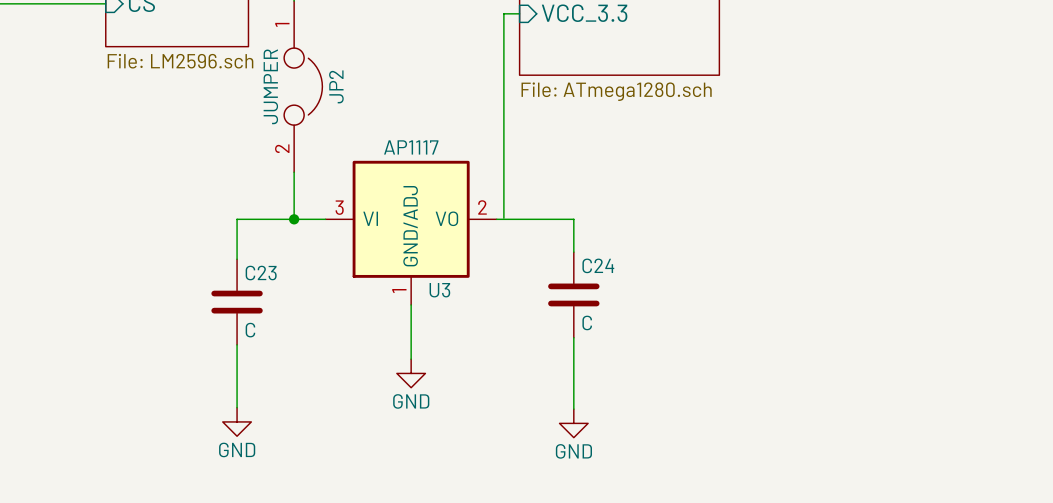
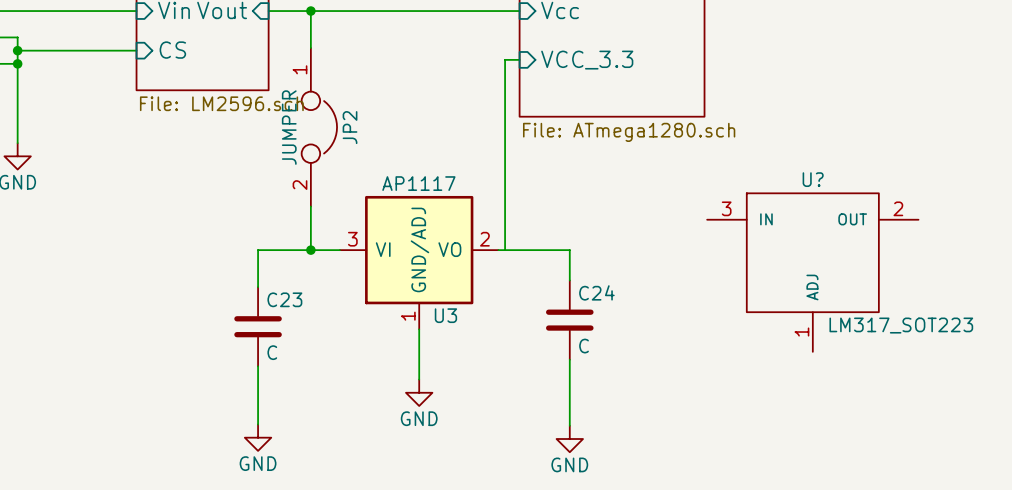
U?: none -> LM317_SOT223 (812, 272)

